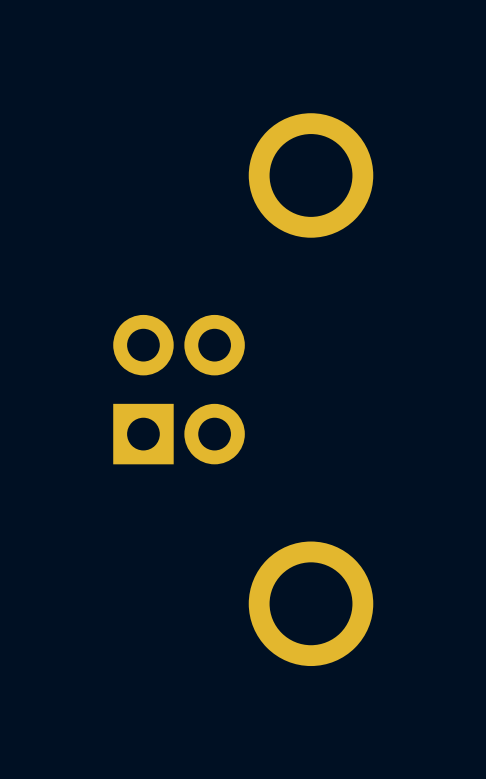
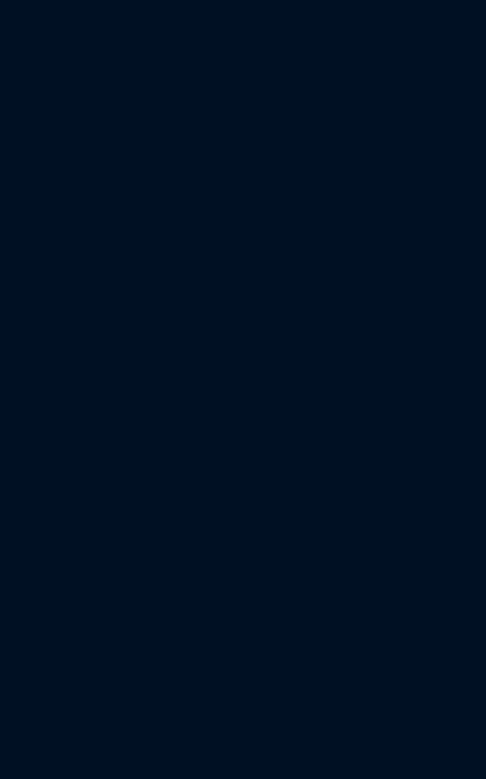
part: (243, 389) -> none

